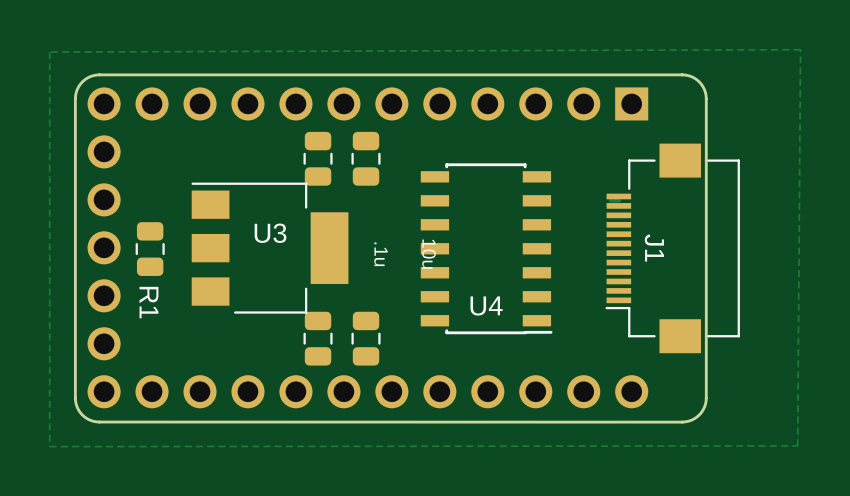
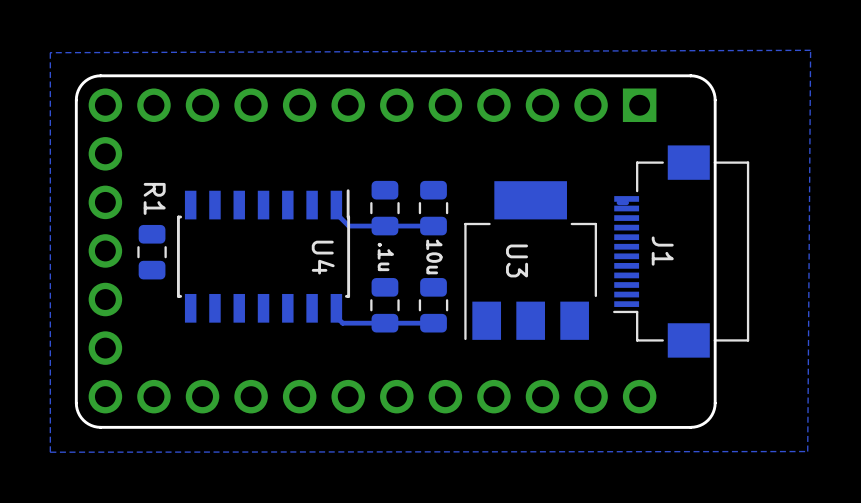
part: (318, 158) -> none
part: (366, 158) -> none
track: none -> (336, 205) (336, 213) (348, 226) (433, 226)
part: none -> (384, 208)
part: none -> (433, 208)
U3 rotation: 0° (269, 248) -> 90° counterclockwise (530, 260)
U3 position: (269, 248) -> (530, 260)
U4 rotation: 0° (486, 248) -> 90° counterclockwise (263, 255)
U4 position: (486, 248) -> (263, 255)
part: none -> (384, 305)
part: none -> (433, 305)
R1 name position: R1 (148, 302) -> R1 (154, 198)
track: none -> (336, 308) (336, 316) (342, 323) (433, 323)
part: (318, 338) -> none
part: (366, 338) -> none

